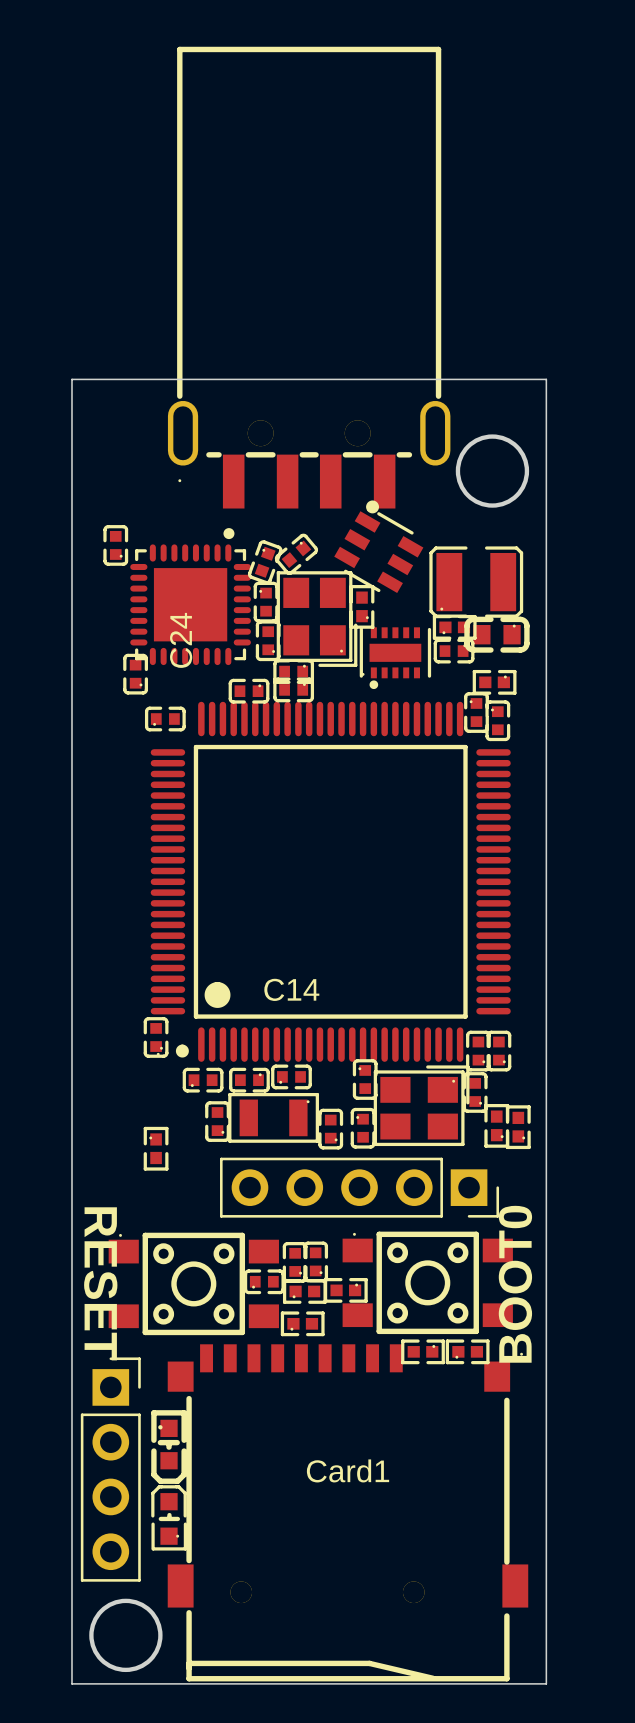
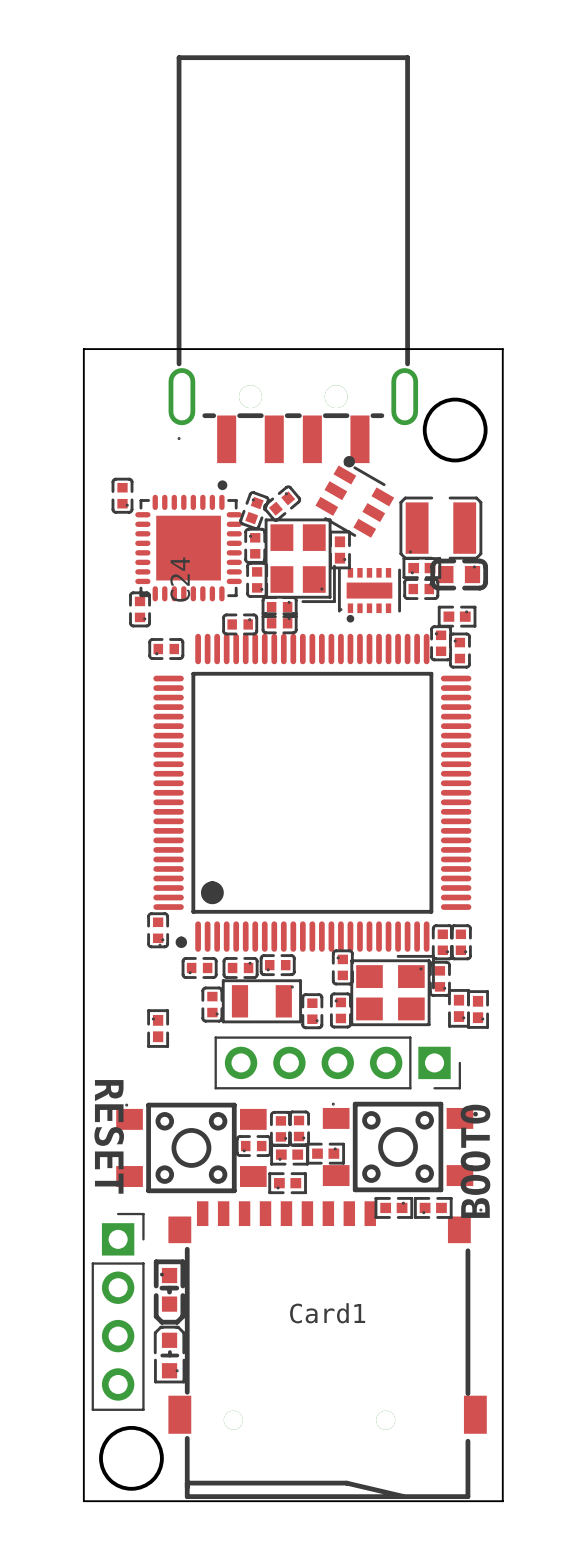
C14 name: C14 (291, 989) -> none

